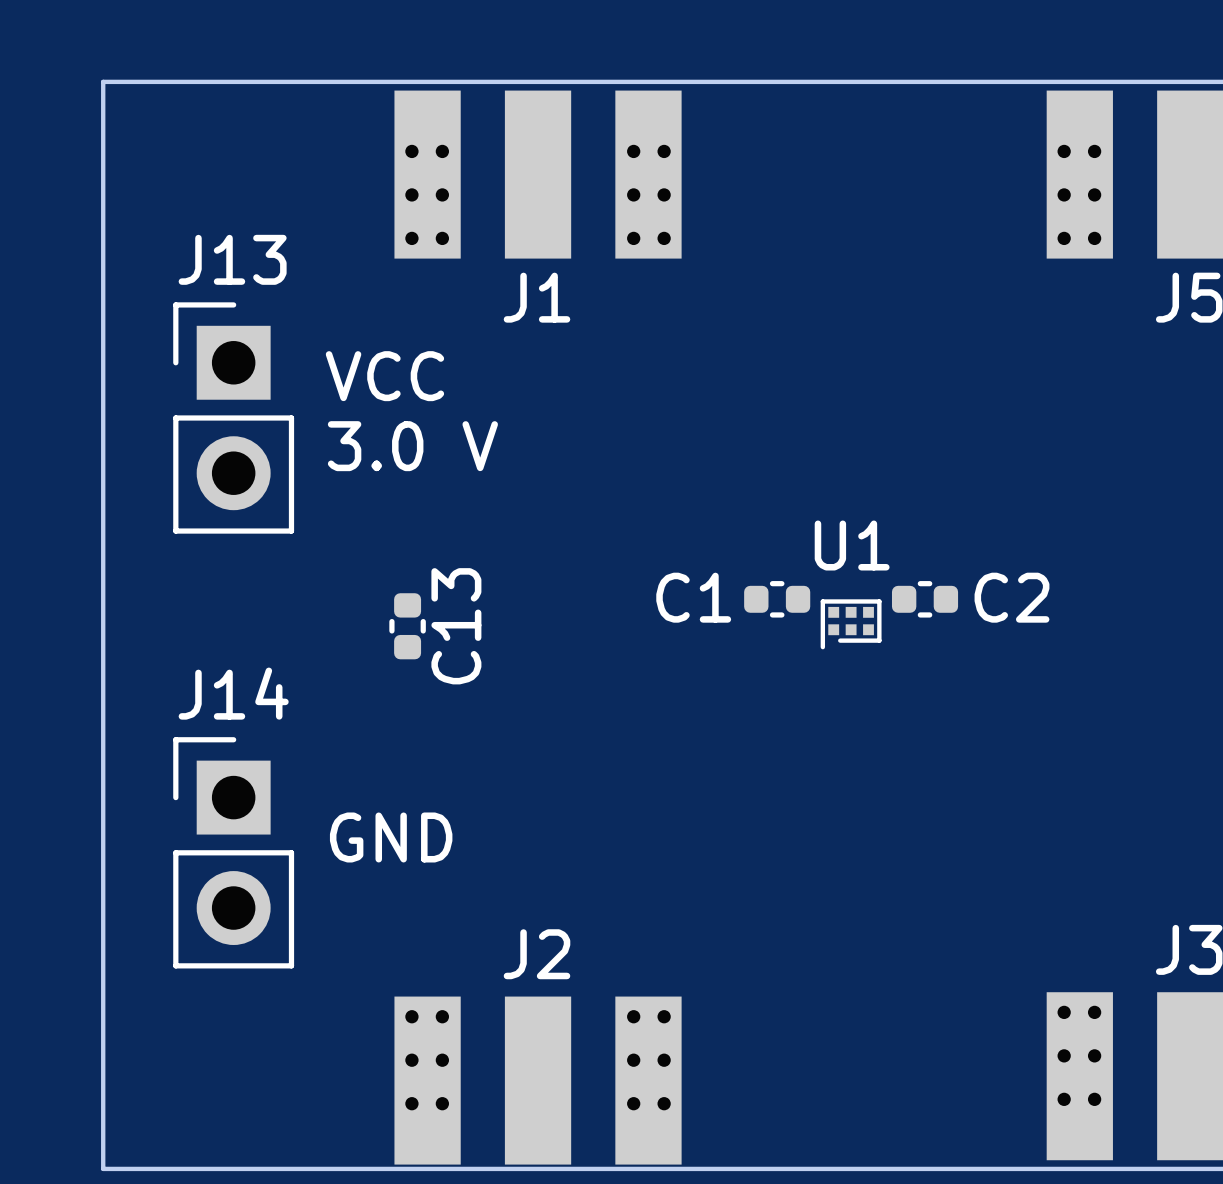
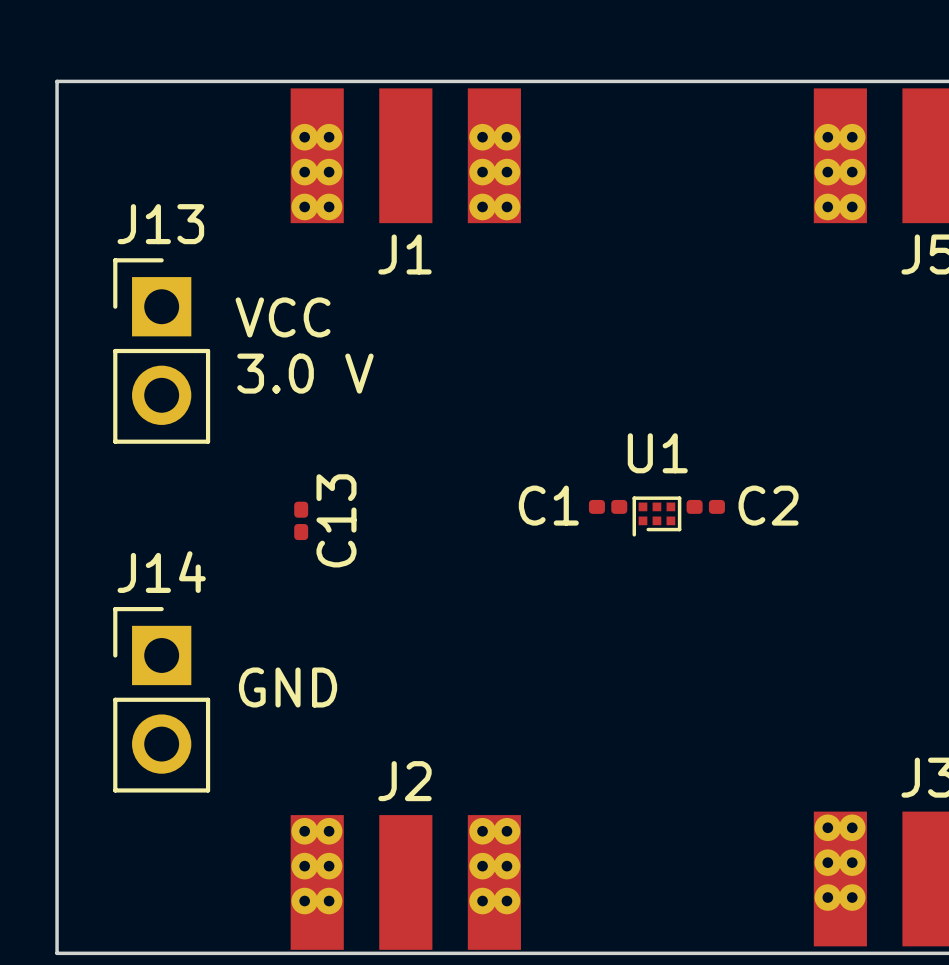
C1 footprint: [744, 581, 811, 618] -> [588, 499, 628, 514]
C2 footprint: [891, 581, 959, 618] -> [686, 499, 725, 514]
C13 footprint: [389, 593, 426, 660] -> [294, 501, 309, 541]

